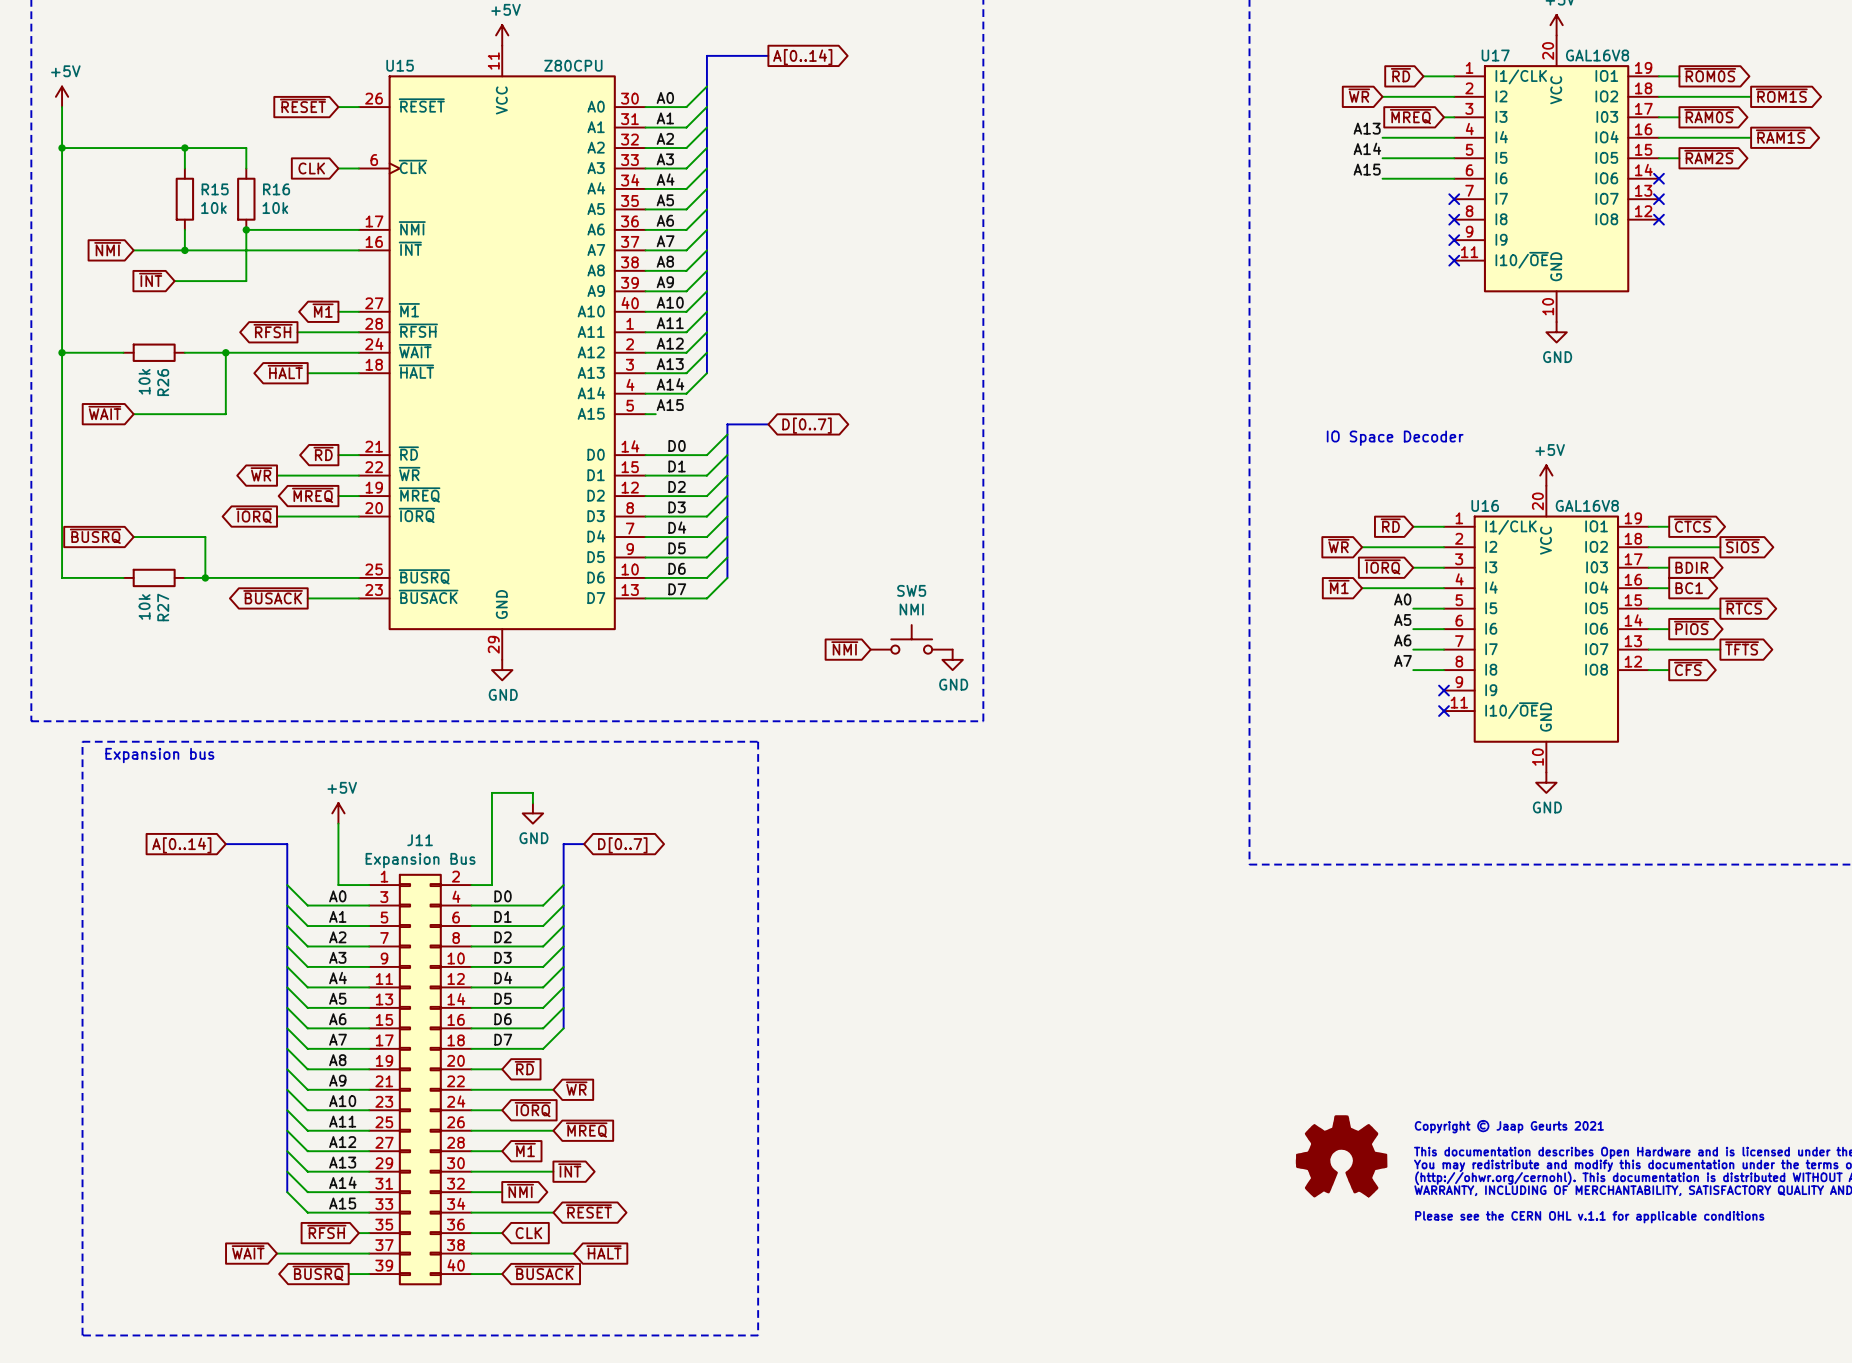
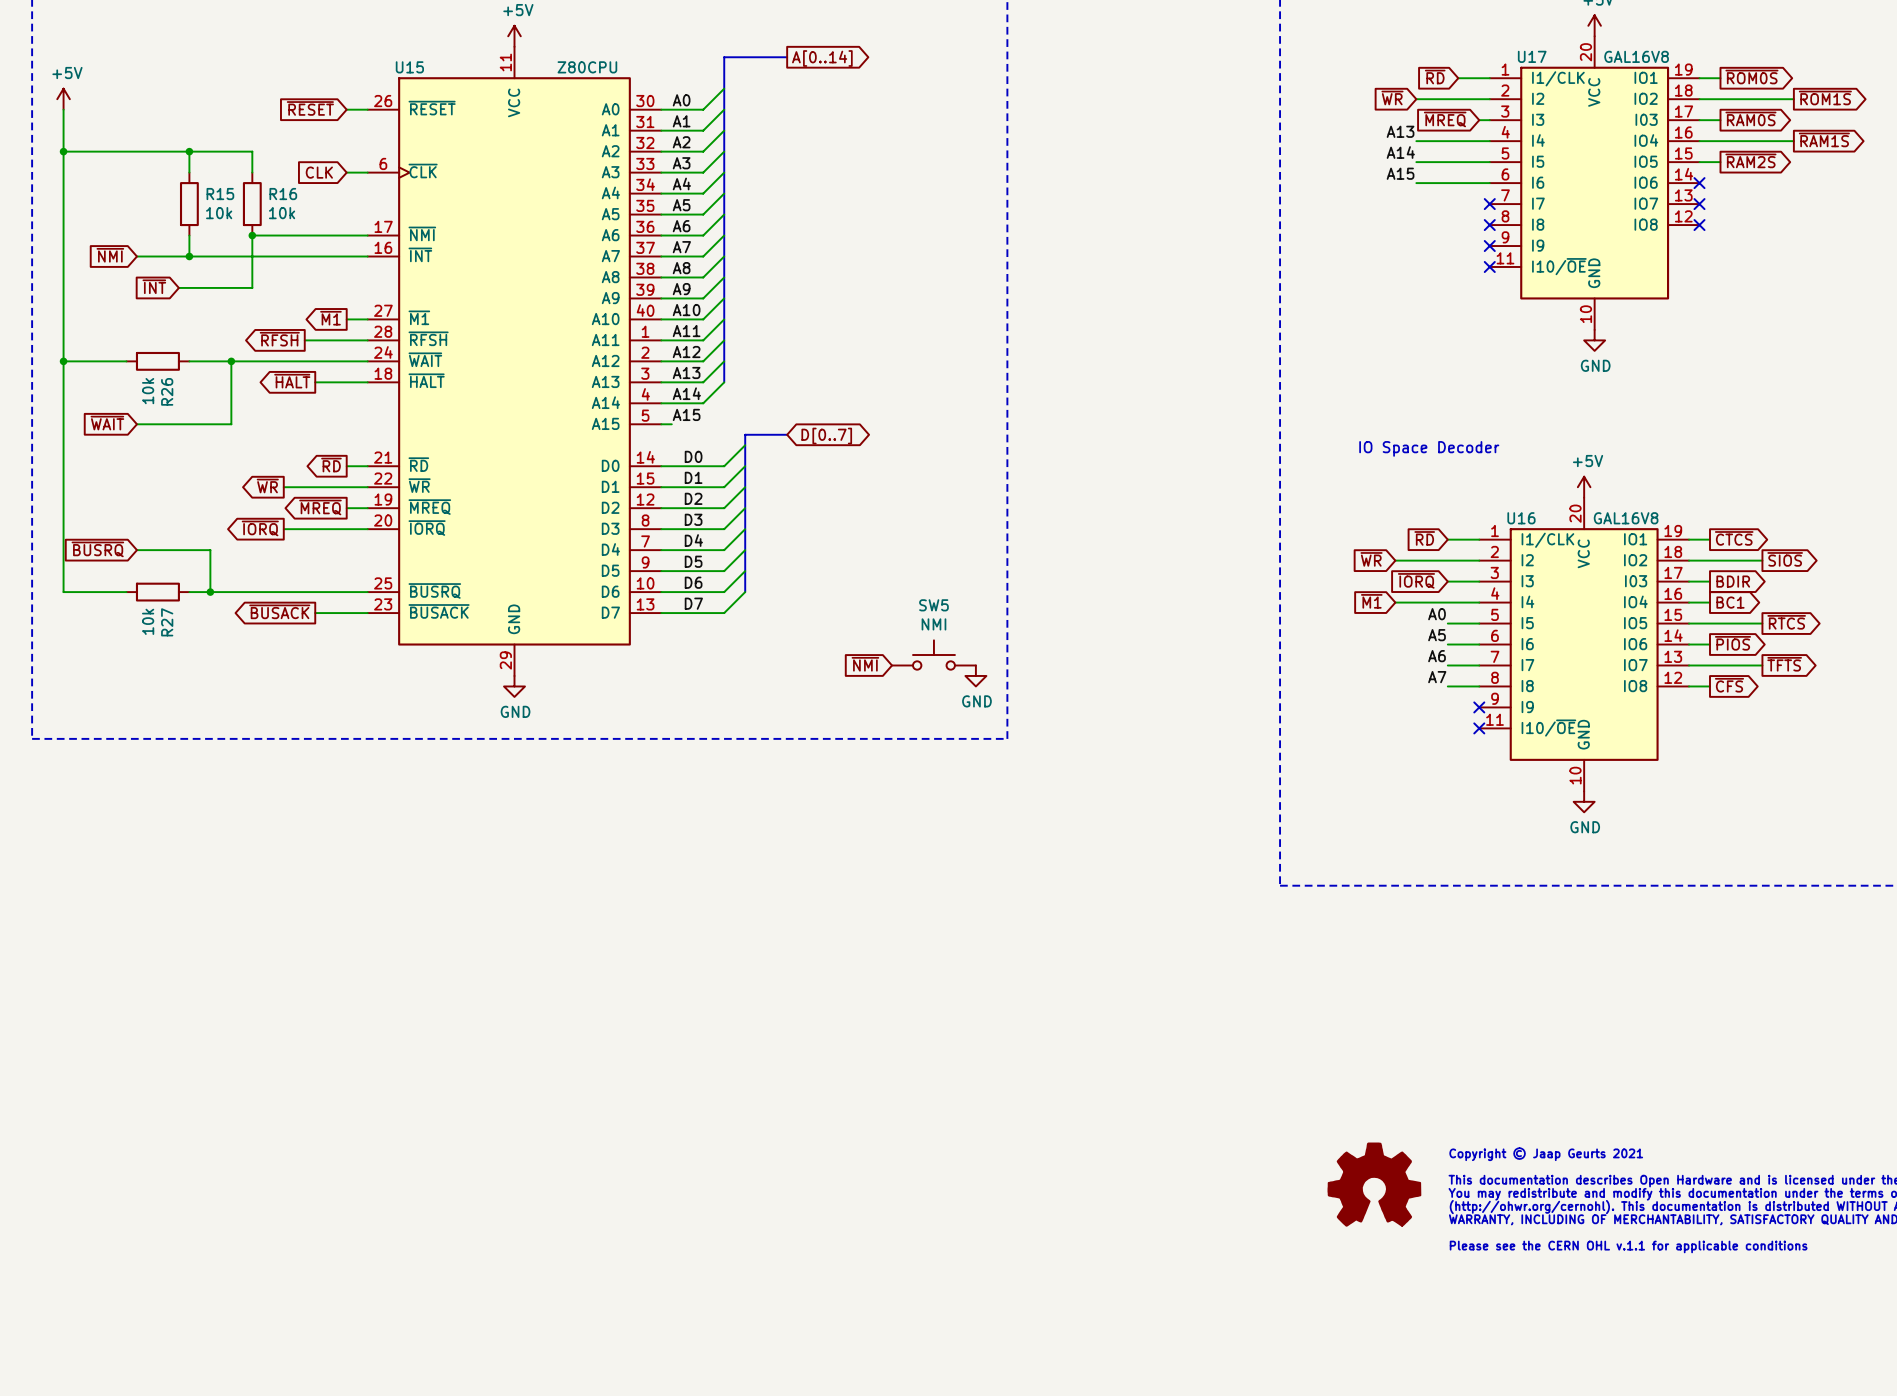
line: (82, 741) (82, 1335) (758, 1335) (758, 741) (82, 741) -> none
text: Expansion bus (159, 755) -> none
wire: (532, 803) (532, 792) (491, 792) (491, 885) (471, 885) -> none
power symbol: +5V (338, 813) -> none
power symbol: GND (532, 813) -> none
wire: (338, 823) (338, 885) (369, 885) -> none
bus: (225, 844) (287, 844) (287, 1192) -> none
bus: (584, 844) (563, 844) (563, 1028) -> none
global label: A[0..14] (181, 845) -> none
global label: D[0..7] (622, 845) -> none
wire: (287, 885) (307, 905) (369, 905) -> none
wire: (563, 885) (543, 905) (471, 905) -> none
label: A0 (337, 896) -> none
label: D0 (503, 896) -> none
wire: (287, 905) (307, 926) (369, 926) -> none
wire: (563, 905) (543, 926) (471, 926) -> none
label: A1 (337, 916) -> none
label: D1 (503, 916) -> none
wire: (287, 926) (307, 946) (369, 946) -> none
wire: (563, 926) (543, 946) (471, 946) -> none
label: A2 (337, 937) -> none
label: D2 (503, 937) -> none
wire: (287, 946) (307, 966) (369, 966) -> none
wire: (563, 946) (543, 966) (471, 966) -> none
label: A3 (337, 957) -> none
label: D3 (503, 957) -> none
wire: (287, 966) (307, 987) (369, 987) -> none
wire: (563, 966) (543, 987) (471, 987) -> none
label: A4 (338, 978) -> none
label: D4 (503, 978) -> none
wire: (287, 987) (307, 1007) (369, 1007) -> none
wire: (563, 987) (543, 1007) (471, 1007) -> none
label: A5 (337, 998) -> none
label: D5 (503, 998) -> none
wire: (287, 1007) (307, 1028) (369, 1028) -> none
wire: (563, 1007) (543, 1028) (471, 1028) -> none
label: A6 (337, 1019) -> none
label: D6 (503, 1019) -> none
wire: (287, 1028) (307, 1048) (369, 1048) -> none
wire: (563, 1028) (543, 1048) (471, 1048) -> none
label: A7 (338, 1039) -> none
label: D7 (503, 1039) -> none
wire: (287, 1048) (307, 1069) (369, 1069) -> none
label: A8 (337, 1060) -> none
global label: ~{RD} (524, 1068) -> none
wire: (287, 1069) (307, 1089) (369, 1089) -> none
wire: (471, 1069) (502, 1069) -> none
J11: Expansion Bus (420, 1079) -> none
label: A9 (337, 1080) -> none
global label: ~{WR} (576, 1088) -> none
wire: (287, 1089) (307, 1110) (369, 1110) -> none
wire: (471, 1089) (553, 1089) -> none
label: A10 (342, 1101) -> none
global label: ~{IORQ} (532, 1109) -> none
wire: (287, 1110) (307, 1130) (369, 1130) -> none
wire: (471, 1110) (502, 1110) -> none
label: A11 (342, 1121) -> none
wire: (287, 1130) (307, 1151) (369, 1151) -> none
wire: (471, 1130) (553, 1130) -> none
global label: ~{MREQ} (586, 1130) -> none
label: A12 (342, 1142) -> none
global label: ~{M1} (525, 1150) -> none
wire: (287, 1151) (307, 1171) (369, 1171) -> none
wire: (471, 1151) (502, 1151) -> none
label: A13 (342, 1162) -> none
global label: ~{INT} (569, 1170) -> none
wire: (287, 1171) (307, 1192) (369, 1192) -> none
wire: (471, 1171) (553, 1171) -> none
label: A14 (342, 1182) -> none
global label: ~{NMI} (520, 1190) -> none
wire: (287, 1192) (307, 1212) (369, 1212) -> none
wire: (471, 1192) (502, 1192) -> none
label: A15 (342, 1203) -> none
global label: ~{RESET} (588, 1211) -> none
wire: (471, 1212) (553, 1212) -> none
global label: ~{RFSH} (326, 1231) -> none
wire: (358, 1233) (369, 1233) -> none
wire: (471, 1233) (502, 1233) -> none
global label: CLK (528, 1233) -> none
global label: ~{WAIT} (248, 1252) -> none
global label: ~{HALT} (604, 1252) -> none
wire: (277, 1253) (369, 1253) -> none
wire: (471, 1253) (573, 1253) -> none
global label: ~{BUSACK} (544, 1272) -> none
global label: ~{BUSRQ} (318, 1273) -> none
wire: (348, 1274) (369, 1274) -> none
wire: (471, 1274) (502, 1274) -> none

